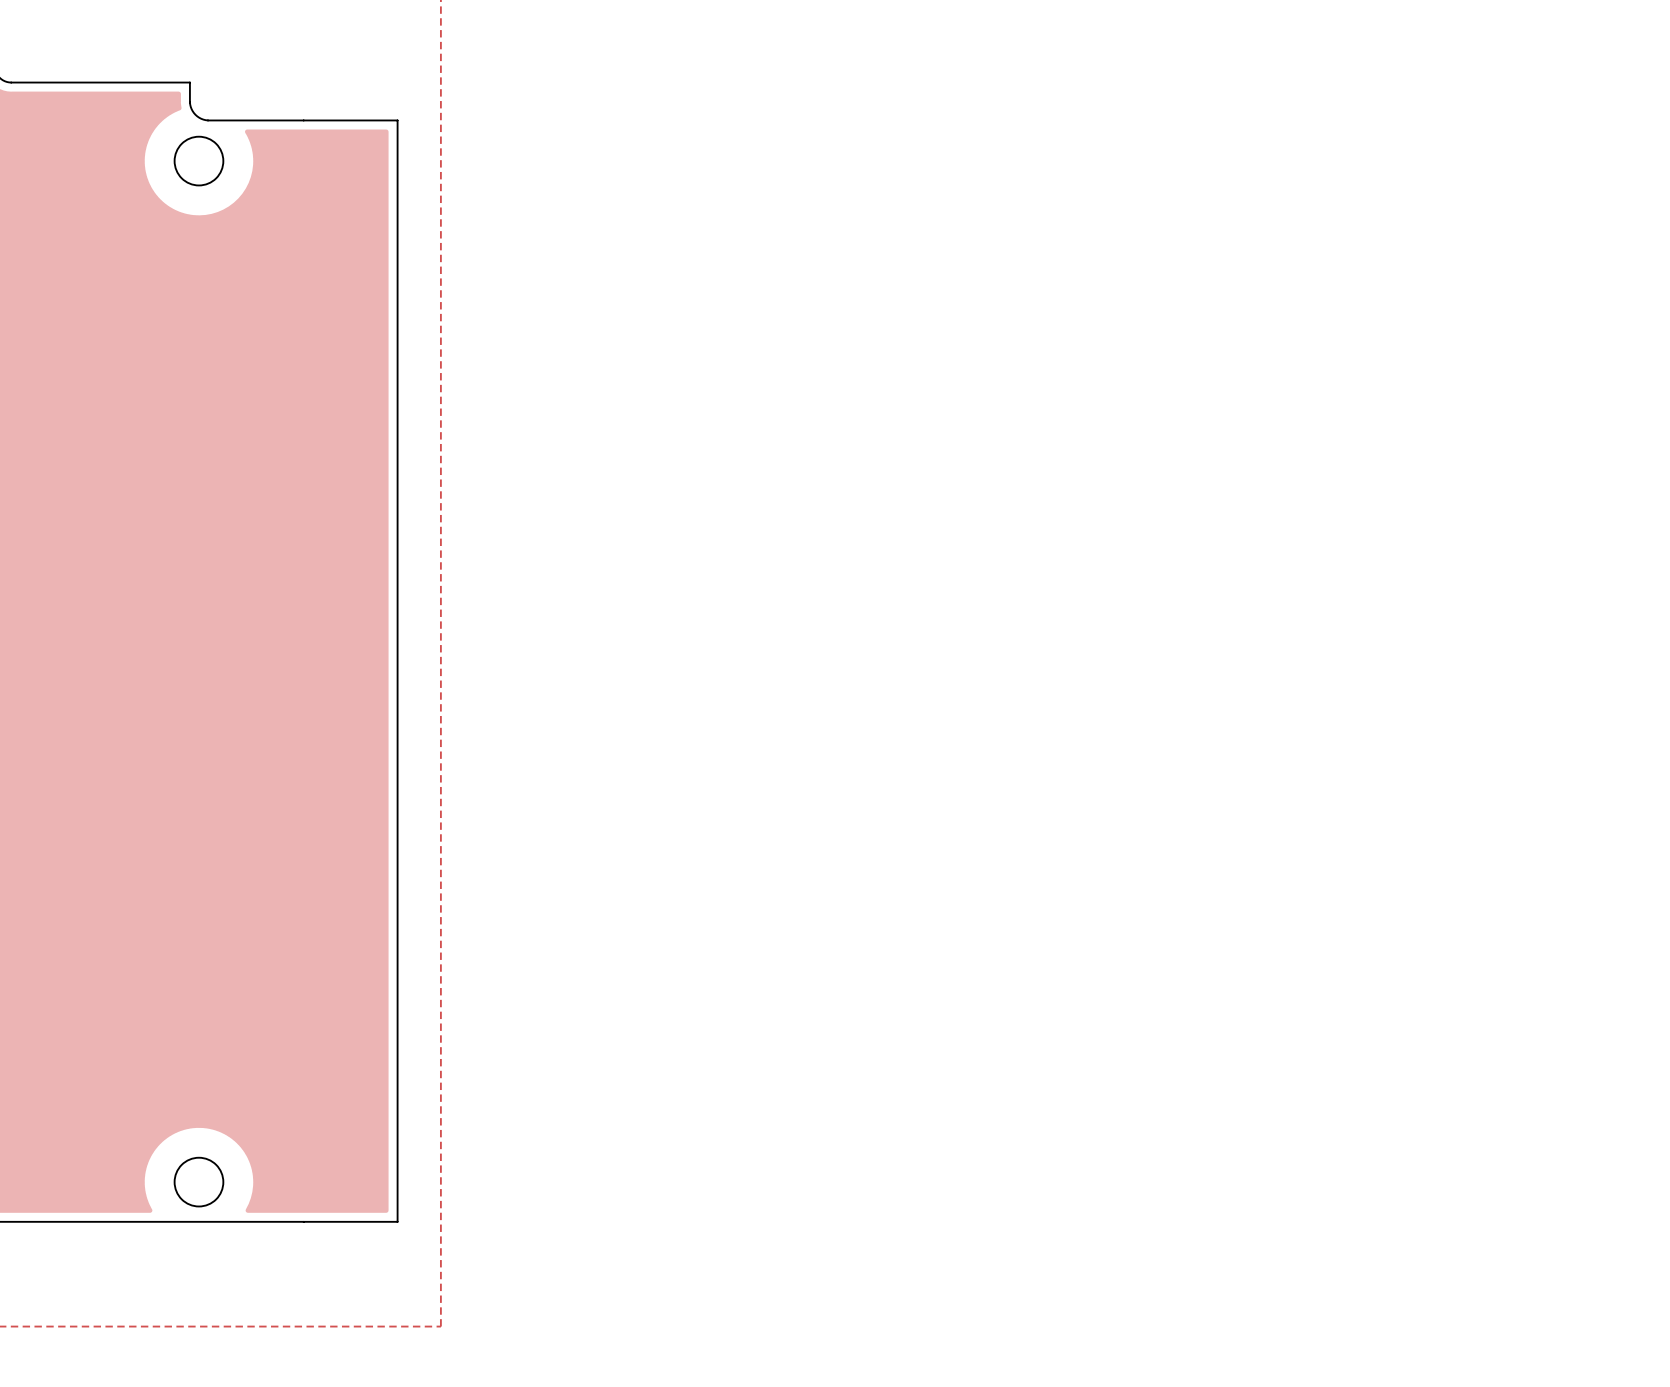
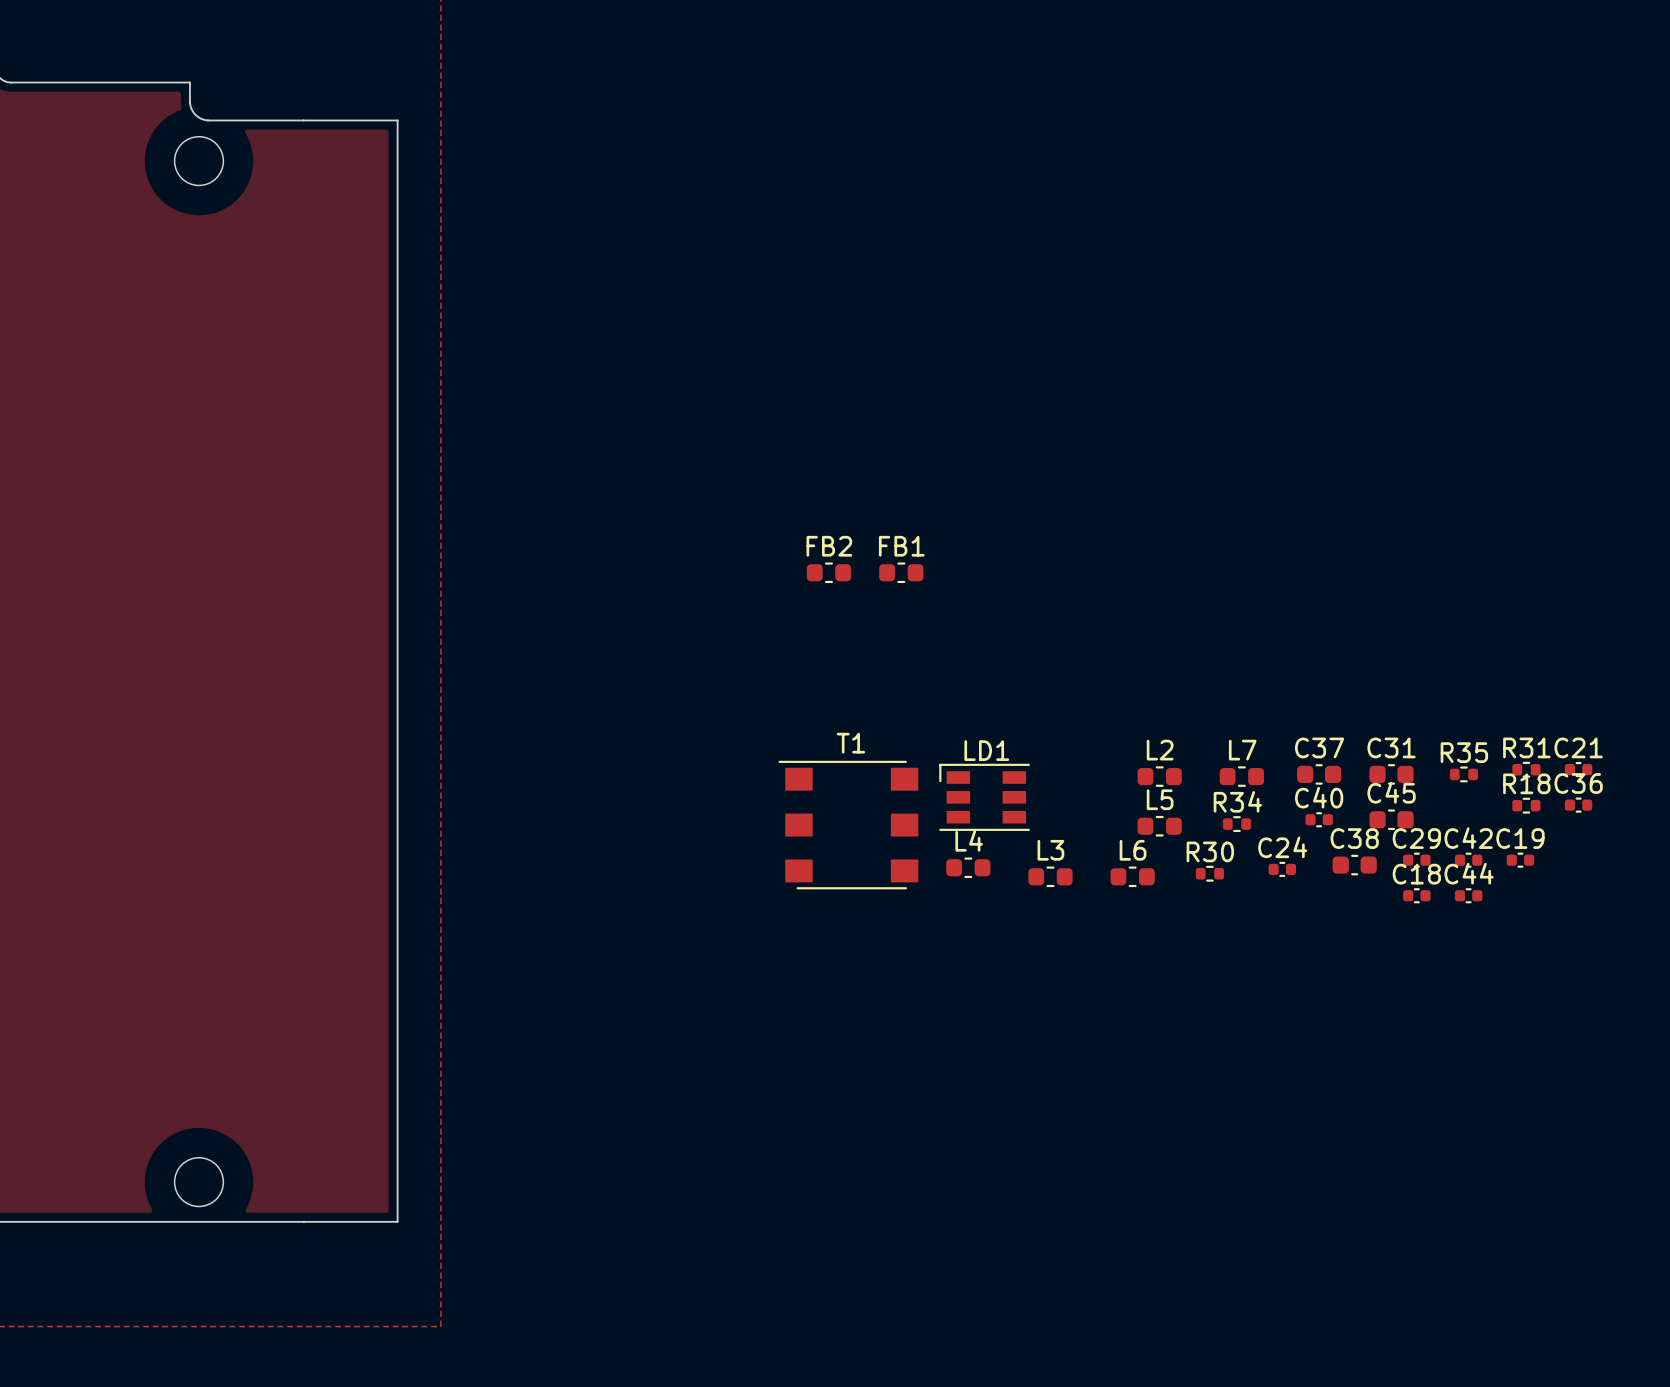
FB2: none -> (828, 572)
FB1: none -> (901, 572)
R31: none -> (1526, 769)
C21: none -> (1578, 769)
C37: none -> (1319, 774)
C31: none -> (1391, 774)
R35: none -> (1463, 774)
L2: none -> (1159, 776)
L7: none -> (1241, 776)
LD1: none -> (984, 797)
R18: none -> (1526, 805)
C36: none -> (1578, 805)
C40: none -> (1319, 819)
C45: none -> (1391, 819)
R34: none -> (1236, 824)
T1: none -> (848, 825)
L5: none -> (1159, 826)
C29: none -> (1416, 860)
C42: none -> (1468, 860)
C19: none -> (1520, 860)
C38: none -> (1354, 865)
L4: none -> (968, 867)
C24: none -> (1282, 869)
R30: none -> (1209, 873)
L3: none -> (1050, 876)
L6: none -> (1132, 876)
C18: none -> (1416, 895)
C44: none -> (1468, 895)

